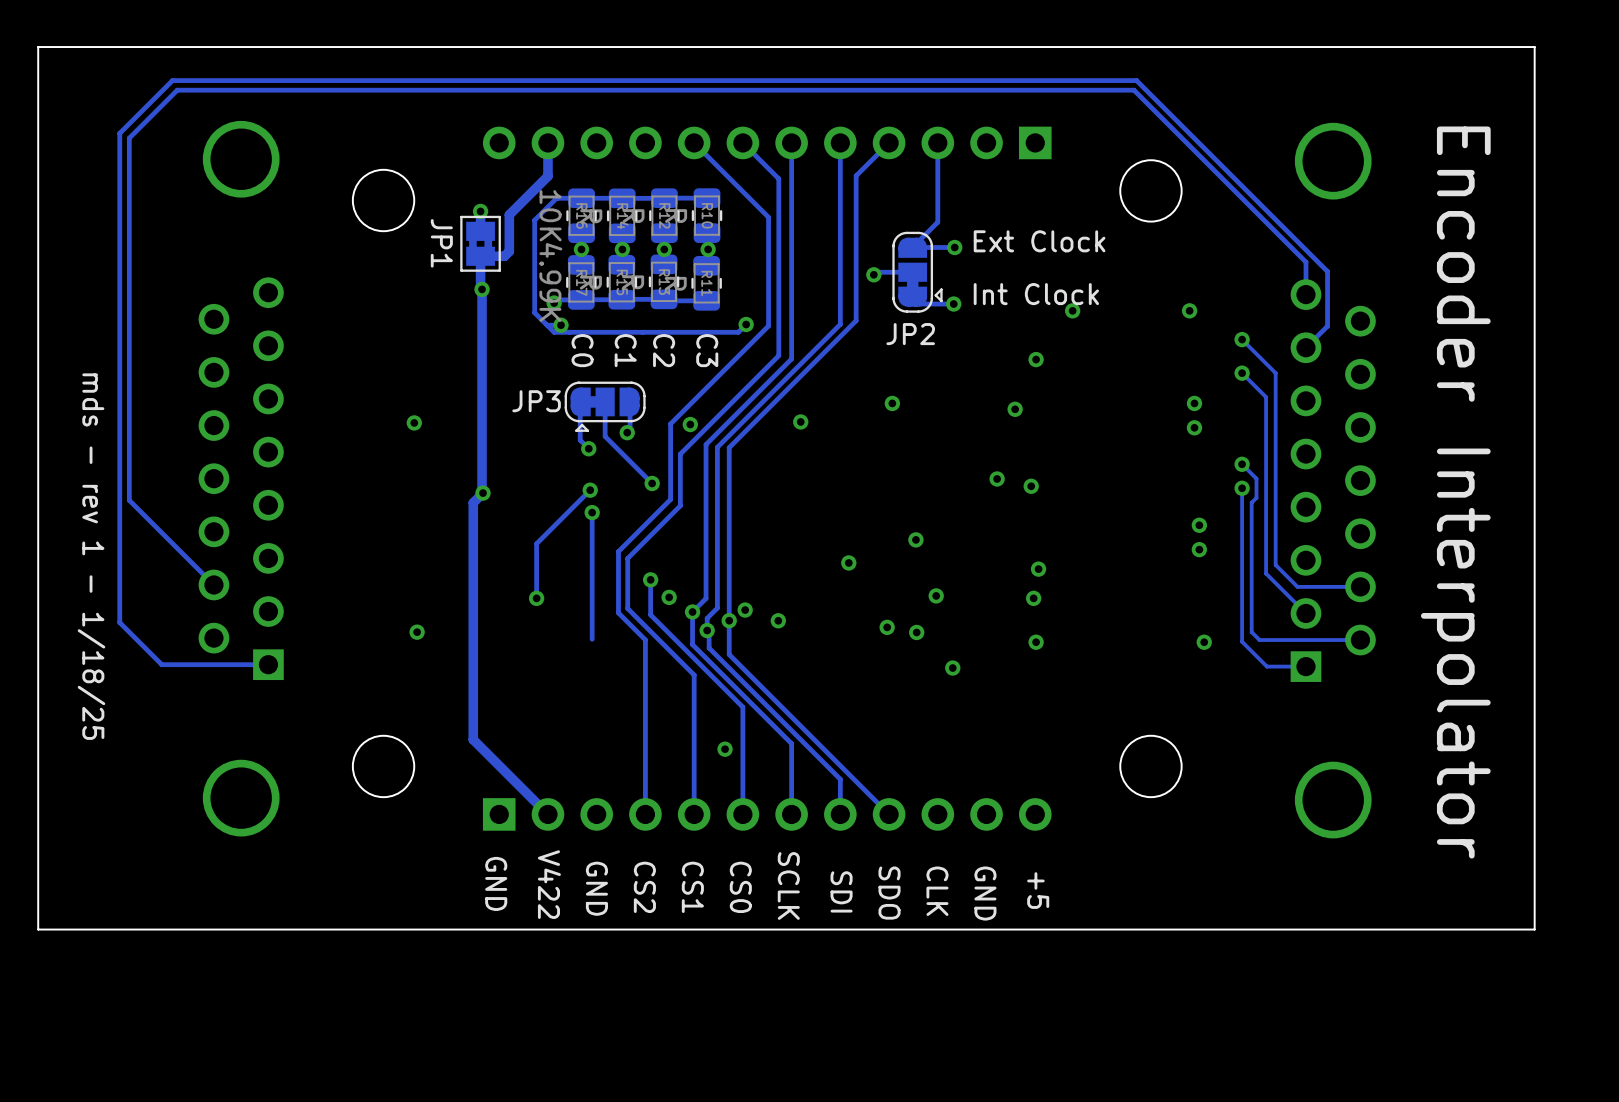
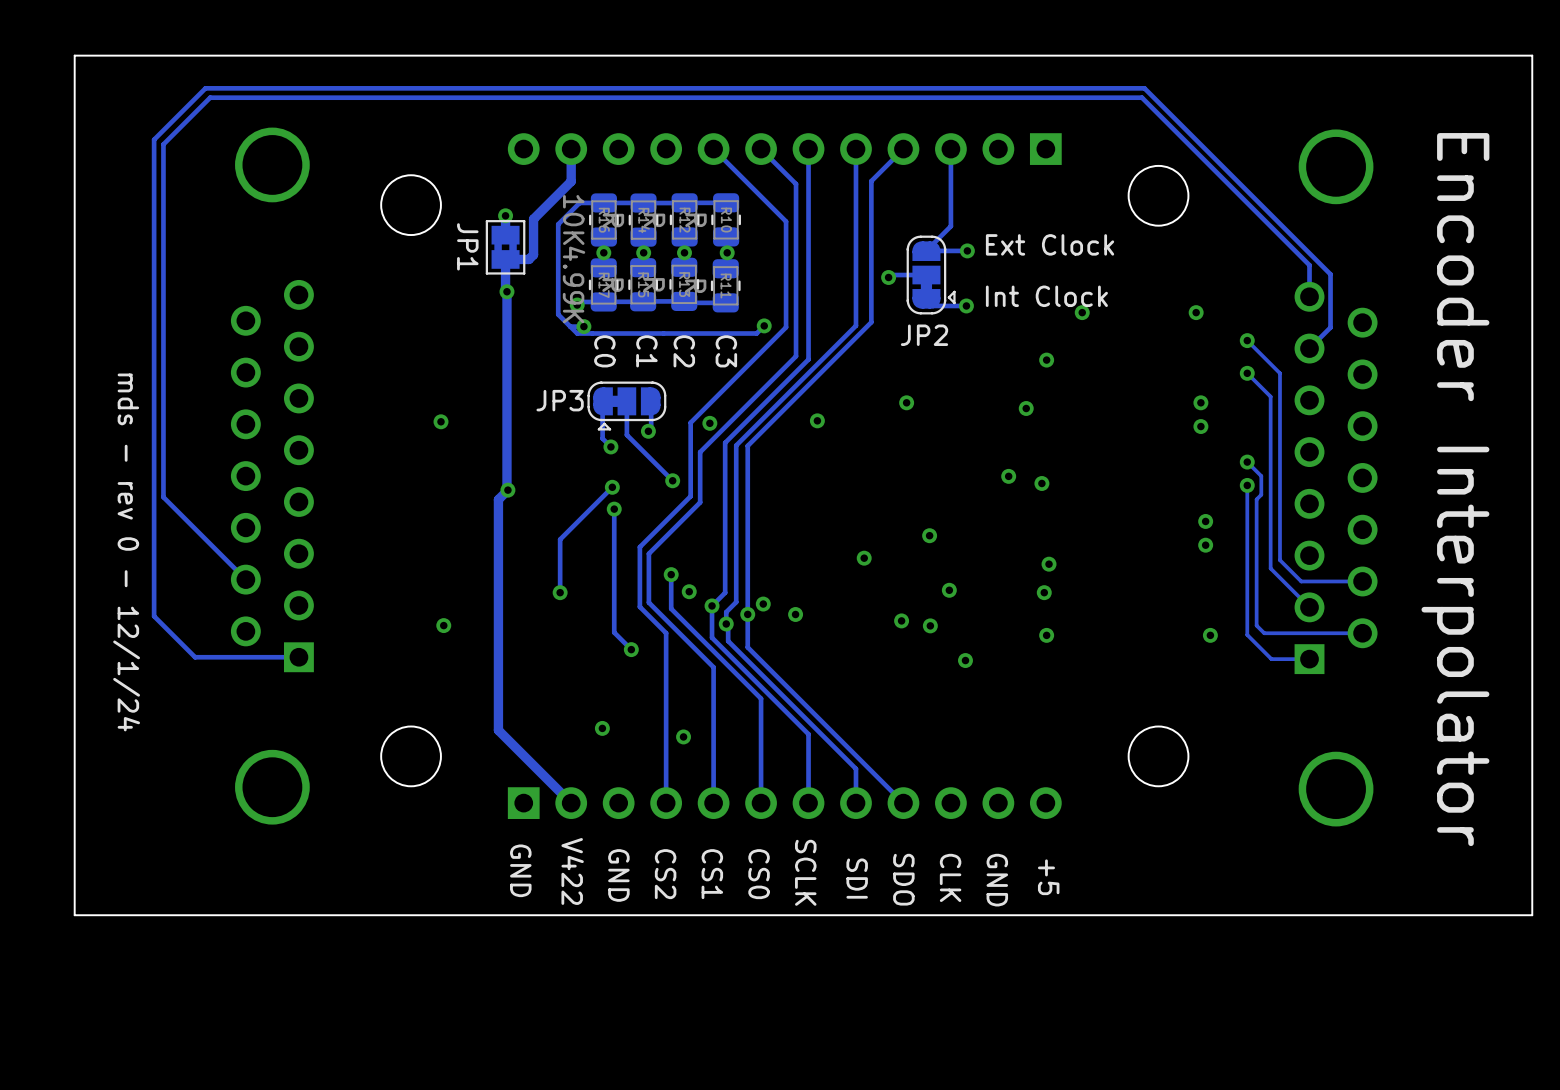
text: mds - rev 1 - 1/18/25 (91, 556) -> mds - rev 0 - 12/1/24 (126, 552)
track: none -> (614, 632) (631, 649)
via: none -> (631, 649)
via: none -> (602, 728)
via position: (725, 749) -> (683, 736)

